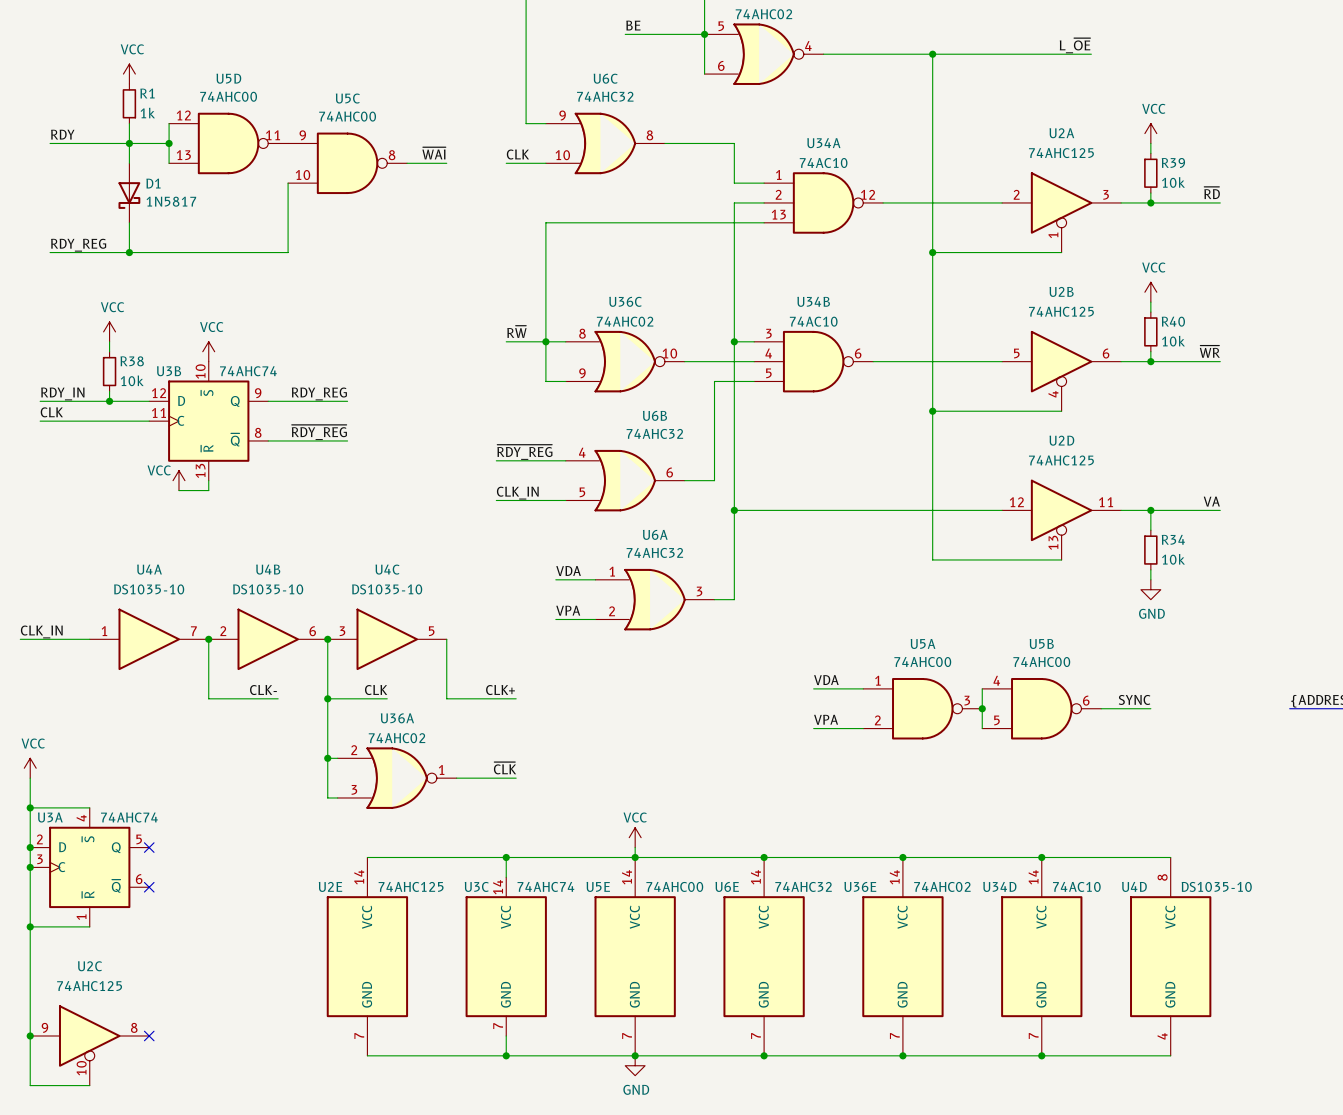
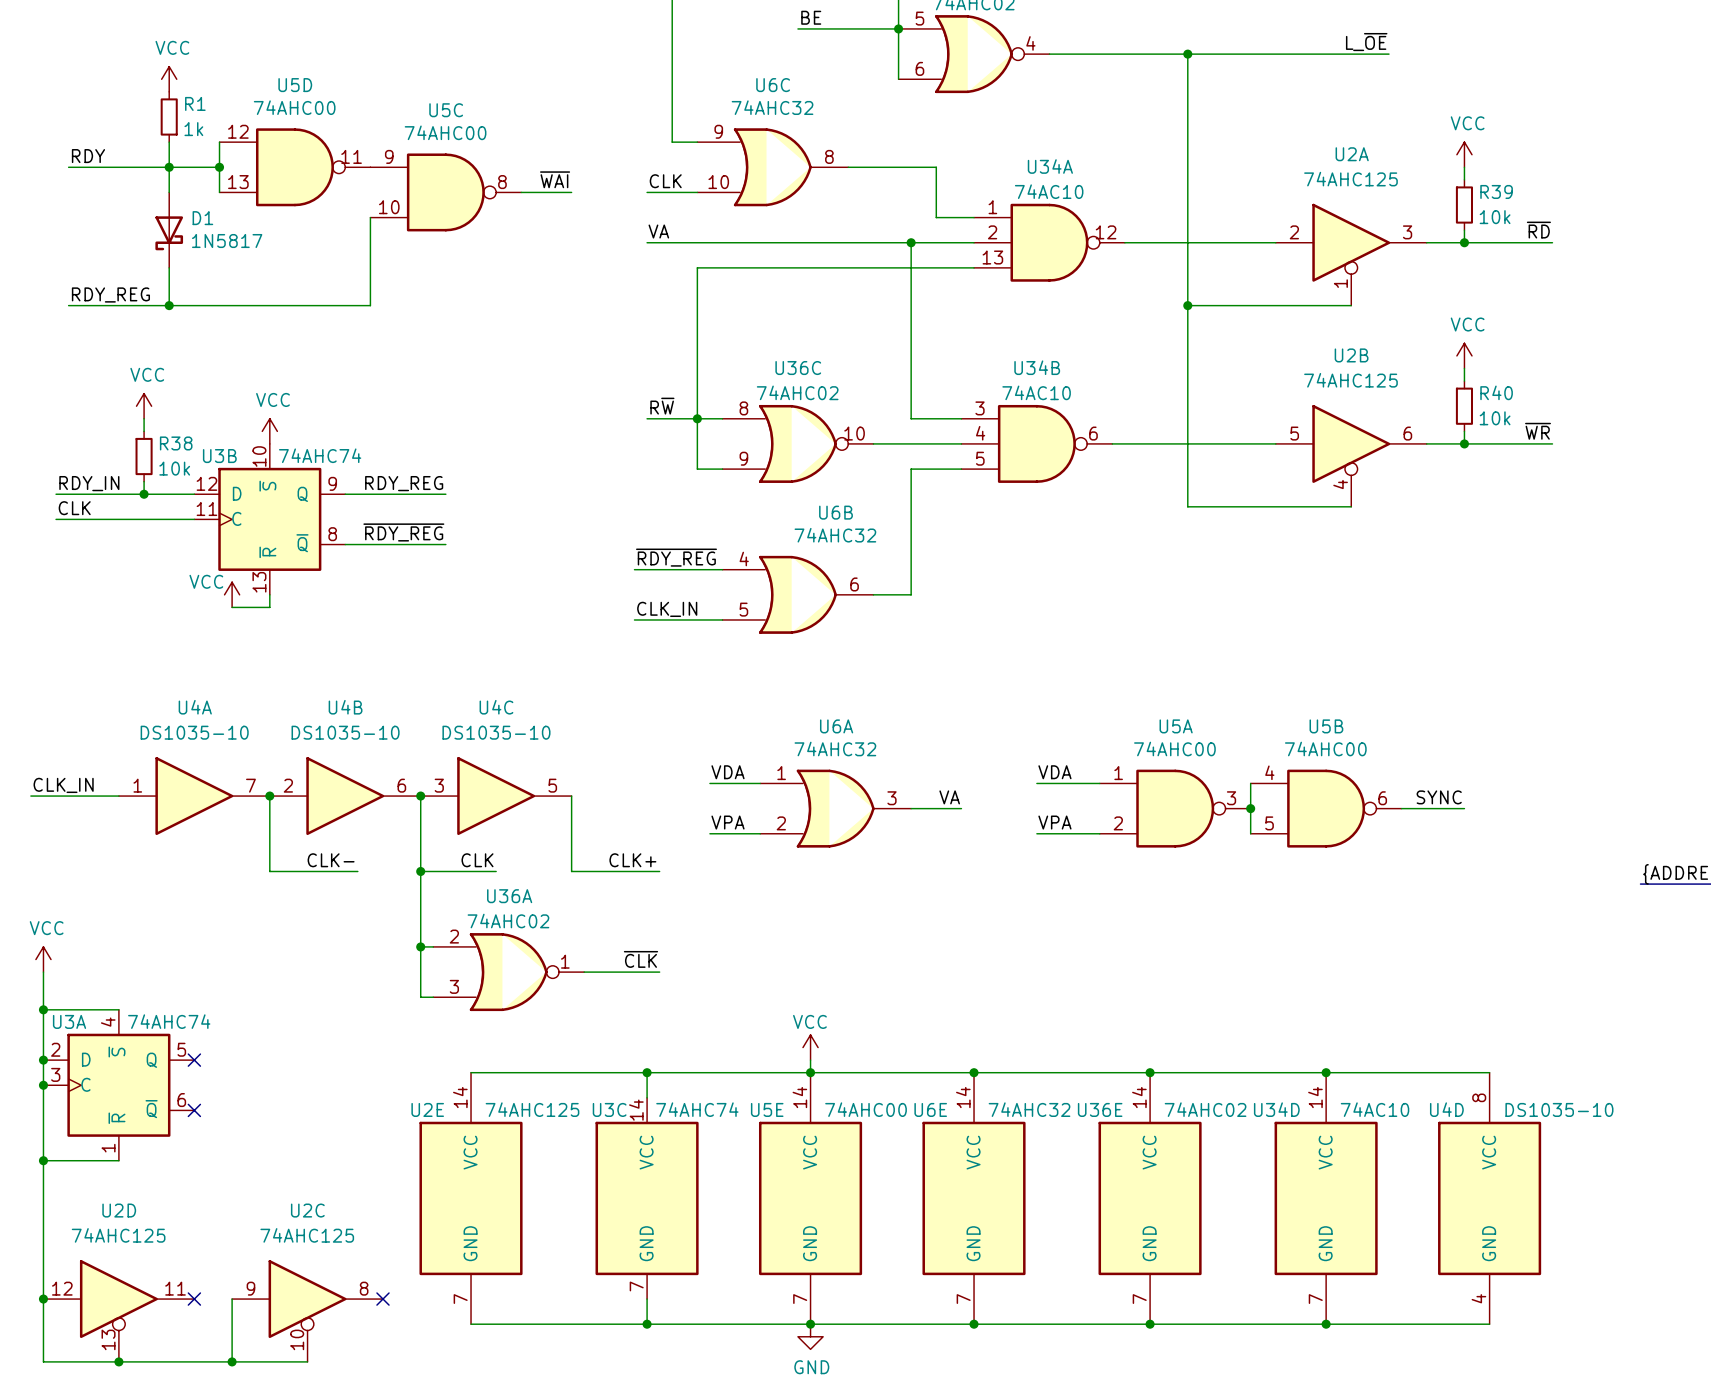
label: none -> VA (658, 231)
wire: none -> (911, 242) (911, 418) (936, 418)
junction: none -> (911, 242)
wire: (734, 202) (734, 599) (714, 599) -> (936, 242) (647, 242)
junction: (734, 341) -> none
wire: (932, 411) (932, 559) (1061, 559) -> none
junction: (932, 411) -> none
label: VA (1211, 501) -> none
wire: (734, 510) (1002, 510) -> none
junction: (734, 510) -> none
wire: (1121, 510) (1220, 510) -> none
wire: (1150, 510) (1150, 530) -> none
junction: (1150, 510) -> none
U2D position: (1061, 519) -> (118, 1310)
R34: 10k (1150, 550) -> none
wire: (1150, 569) (1150, 579) -> none
label position: VDA (568, 571) -> VDA (728, 772)
wire: (555, 579) (595, 579) -> (709, 783) (760, 783)
power symbol: GND (1150, 589) -> none
U6A position: (655, 599) -> (835, 808)
label position: VPA (568, 610) -> VPA (728, 822)
wire: (555, 619) (595, 619) -> (709, 833) (760, 833)
label: none -> VA (949, 797)
wire: none -> (911, 808) (961, 808)
junction: none -> (1250, 808)
label position: VDA (826, 680) -> VDA (1054, 772)
wire: (813, 688) (863, 688) -> (1036, 783) (1099, 783)
wire: (982, 688) (982, 728) -> (1250, 783) (1250, 833)
label position: SYNC (1134, 699) -> SYNC (1439, 797)
U5A position: (922, 708) -> (1175, 808)
junction: (982, 708) -> none
U5B position: (1041, 708) -> (1326, 808)
wire: (1101, 708) (1150, 708) -> (1401, 808) (1464, 808)
label position: VPA (826, 719) -> VPA (1054, 822)
wire: (813, 728) (863, 728) -> (1036, 833) (1099, 833)
wire: none -> (232, 1299) (232, 1361)
no-connect mark: none -> (382, 1299)
U2C position: (89, 1045) -> (307, 1310)
wire: none -> (118, 1361) (307, 1361)
junction: none -> (118, 1361)
junction: none -> (232, 1361)

